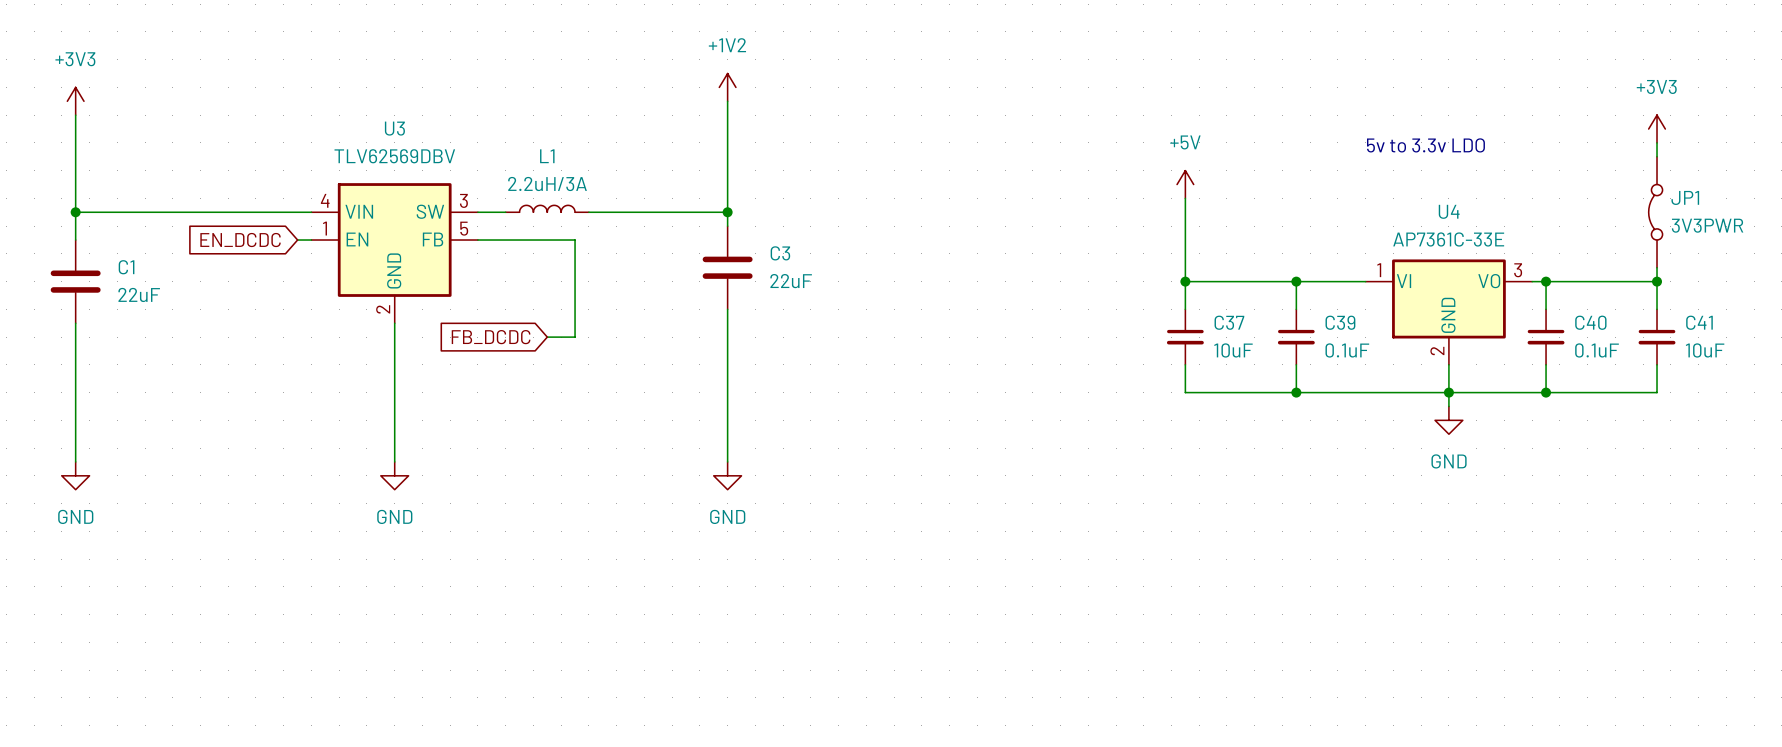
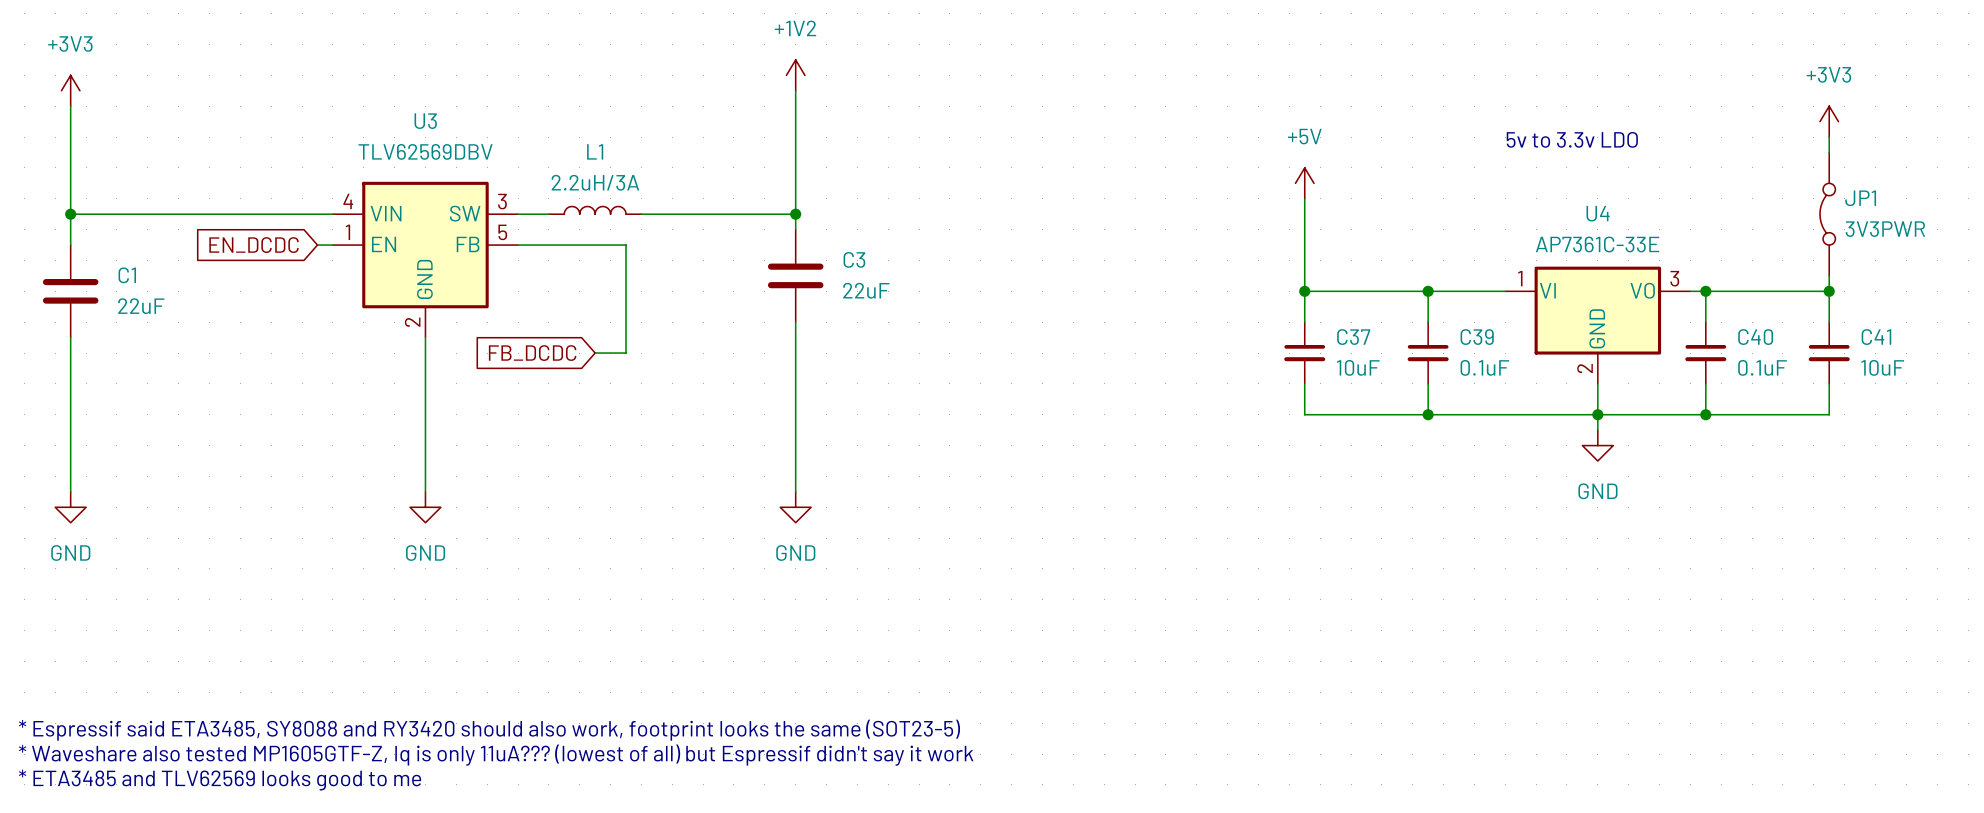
text: none -> * Espressif said ETA3485, SY8088 and RY3420 should also work, footprint looks the same (SOT23-5) (489, 730)
text: none -> * Waveshare also tested MP1605GTF-Z, Iq is only 11uA??? (lowest of all) but Espressif didn't say it work (496, 755)
text: none -> * ETA3485 and TLV62569 looks good to me (220, 780)

